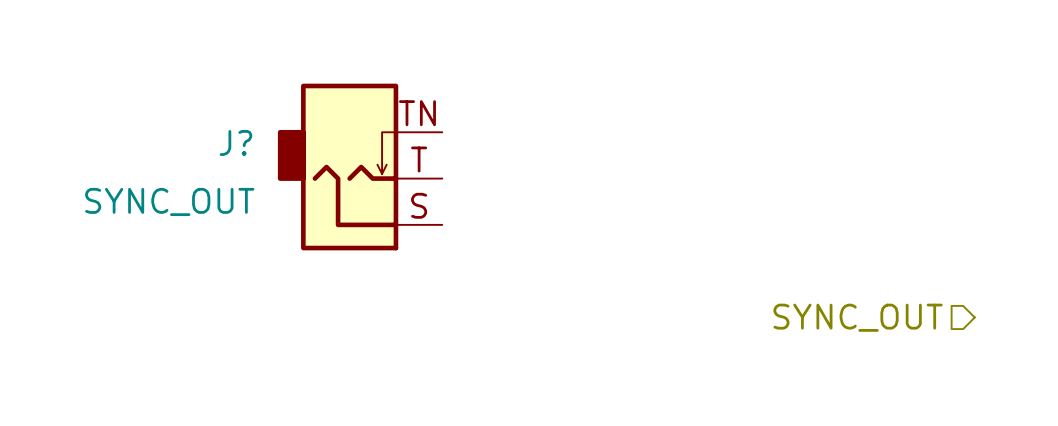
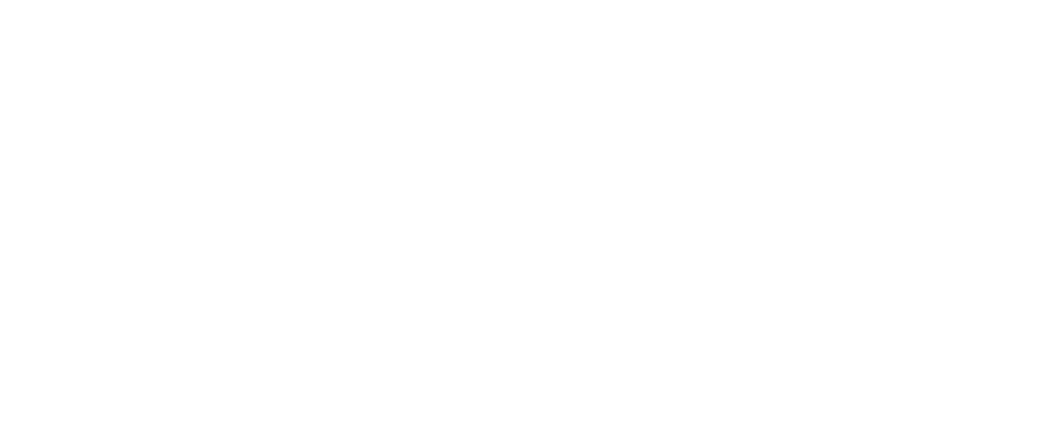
J?: SYNC_OUT (360, 167) -> none
hierarchical label: SYNC_OUT (858, 317) -> none

